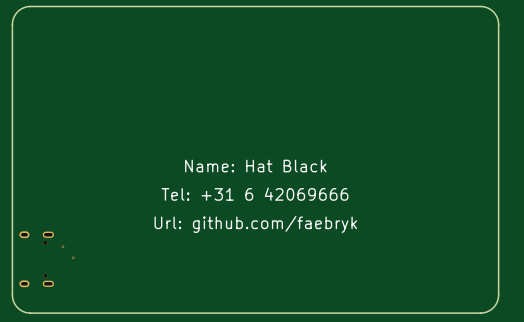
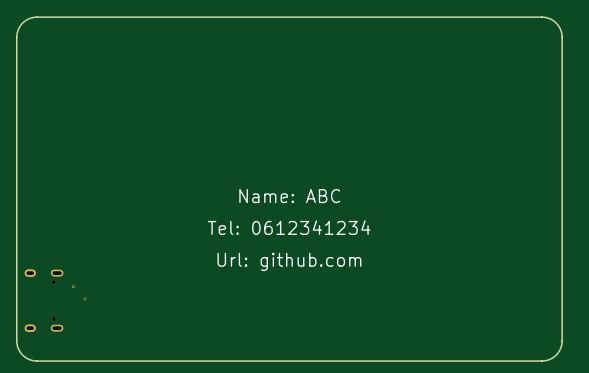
text: Name: Hat Black (255, 166) -> Name: ABC (289, 196)
text: Tel: +31 6 42069666 (254, 194) -> Tel: 0612341234 (289, 227)
text: Url: github.com/faebryk (255, 224) -> Url: github.com (289, 261)

